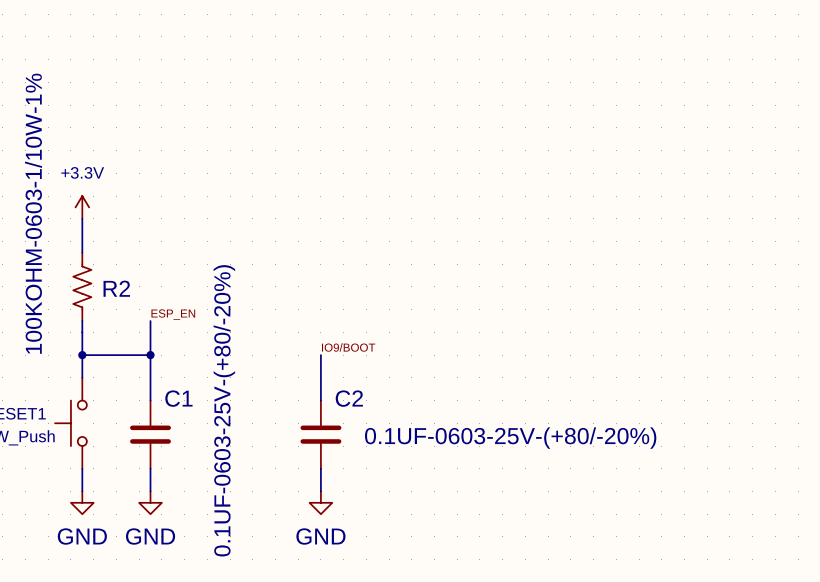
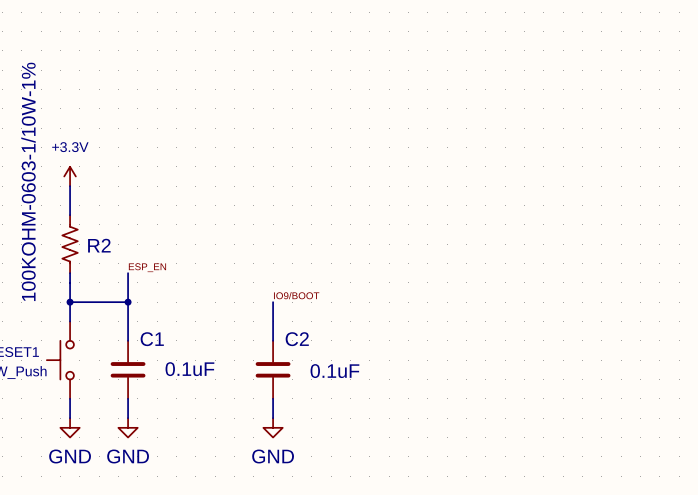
C1 value: 0.1UF-0603-25V-(+80/-20%) (224, 410) -> 0.1uF (189, 369)
C2 value: 0.1UF-0603-25V-(+80/-20%) (510, 438) -> 0.1uF (334, 371)

